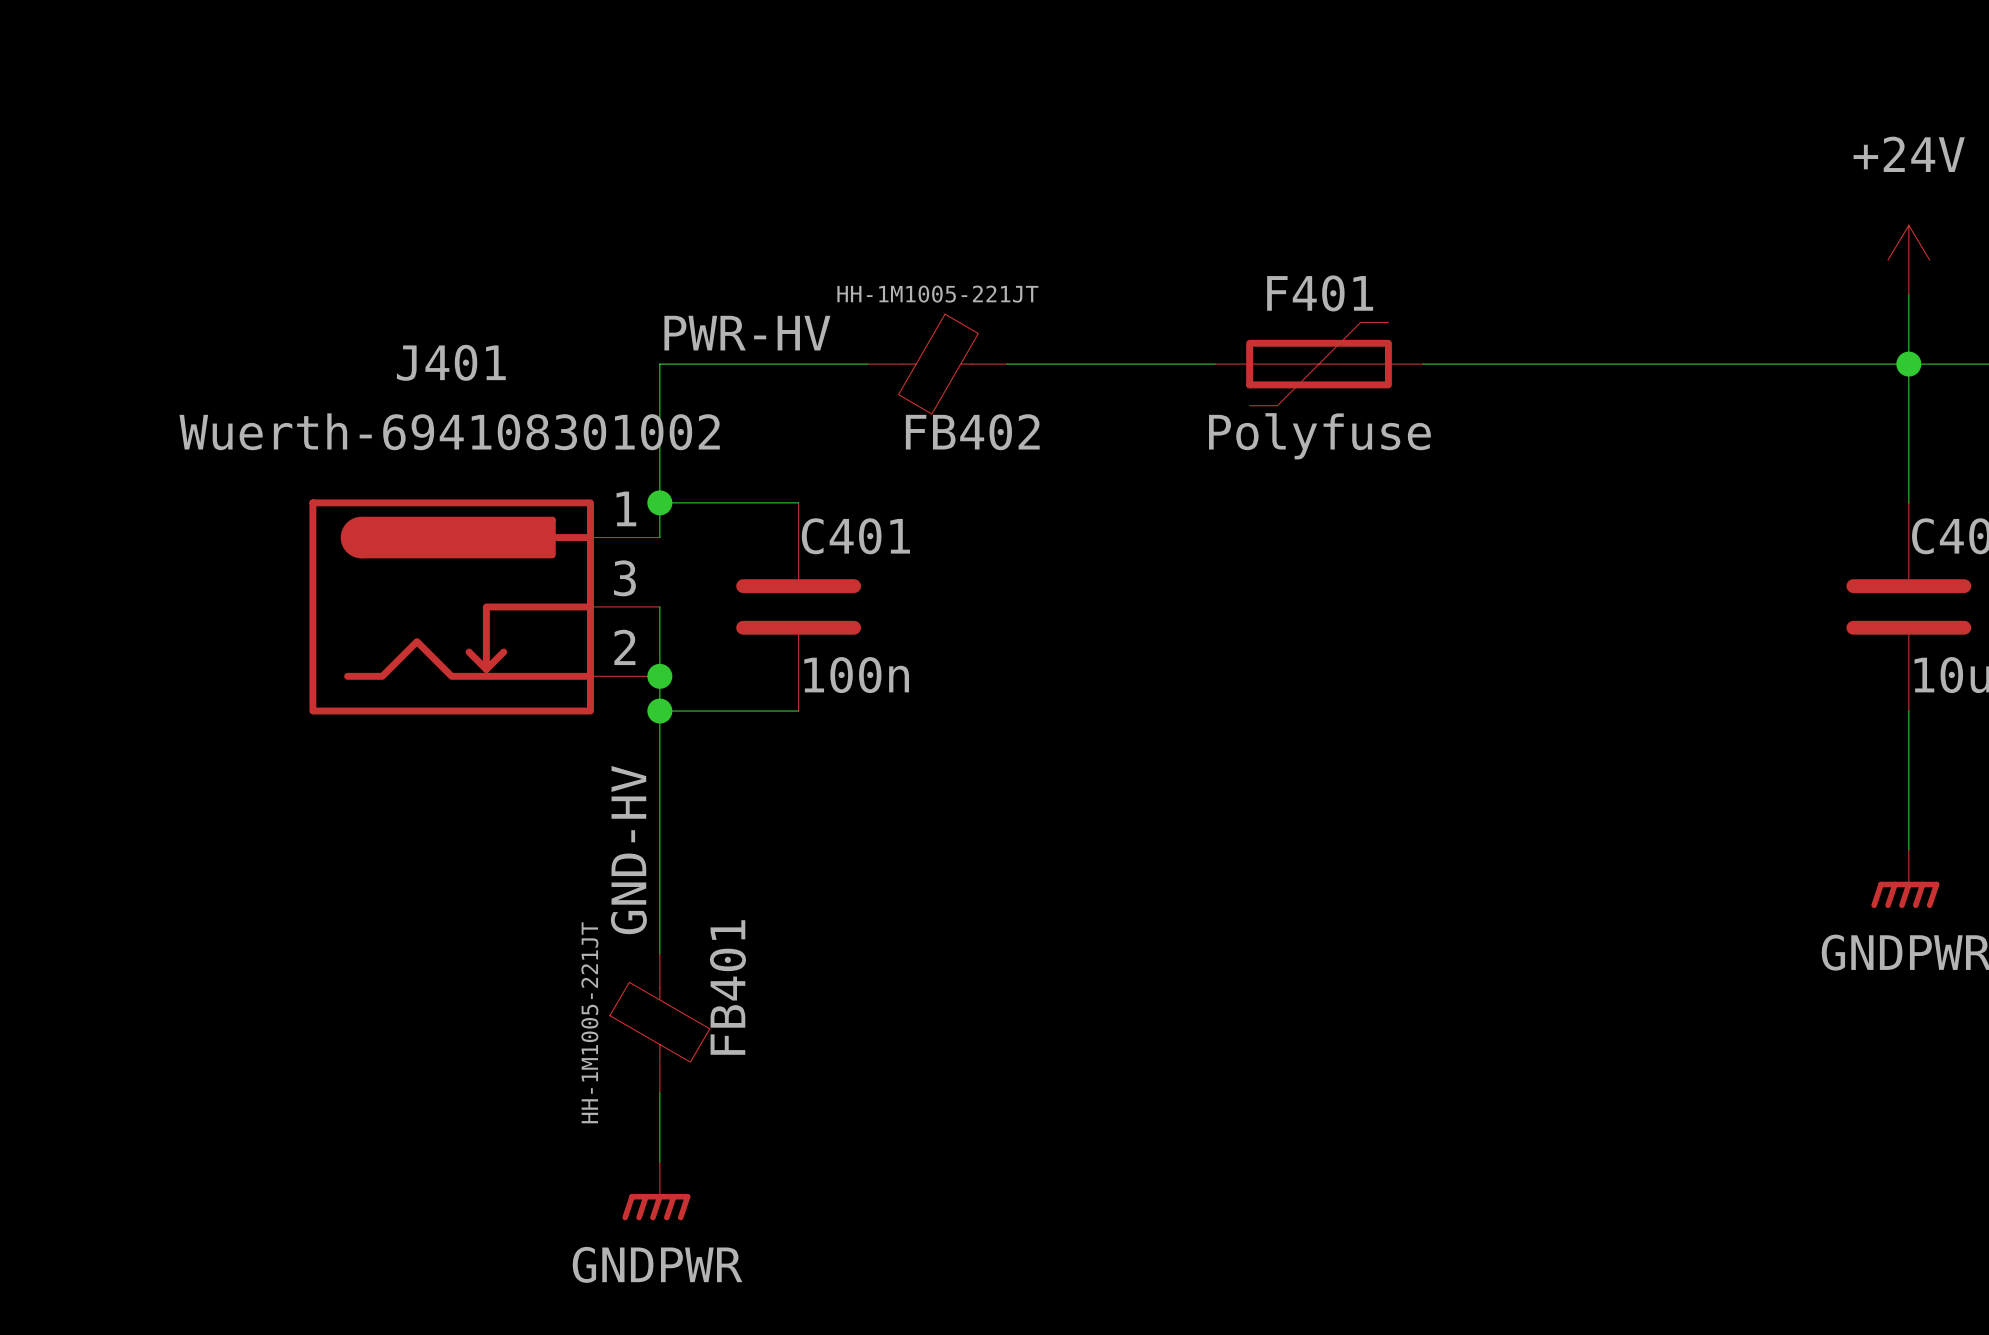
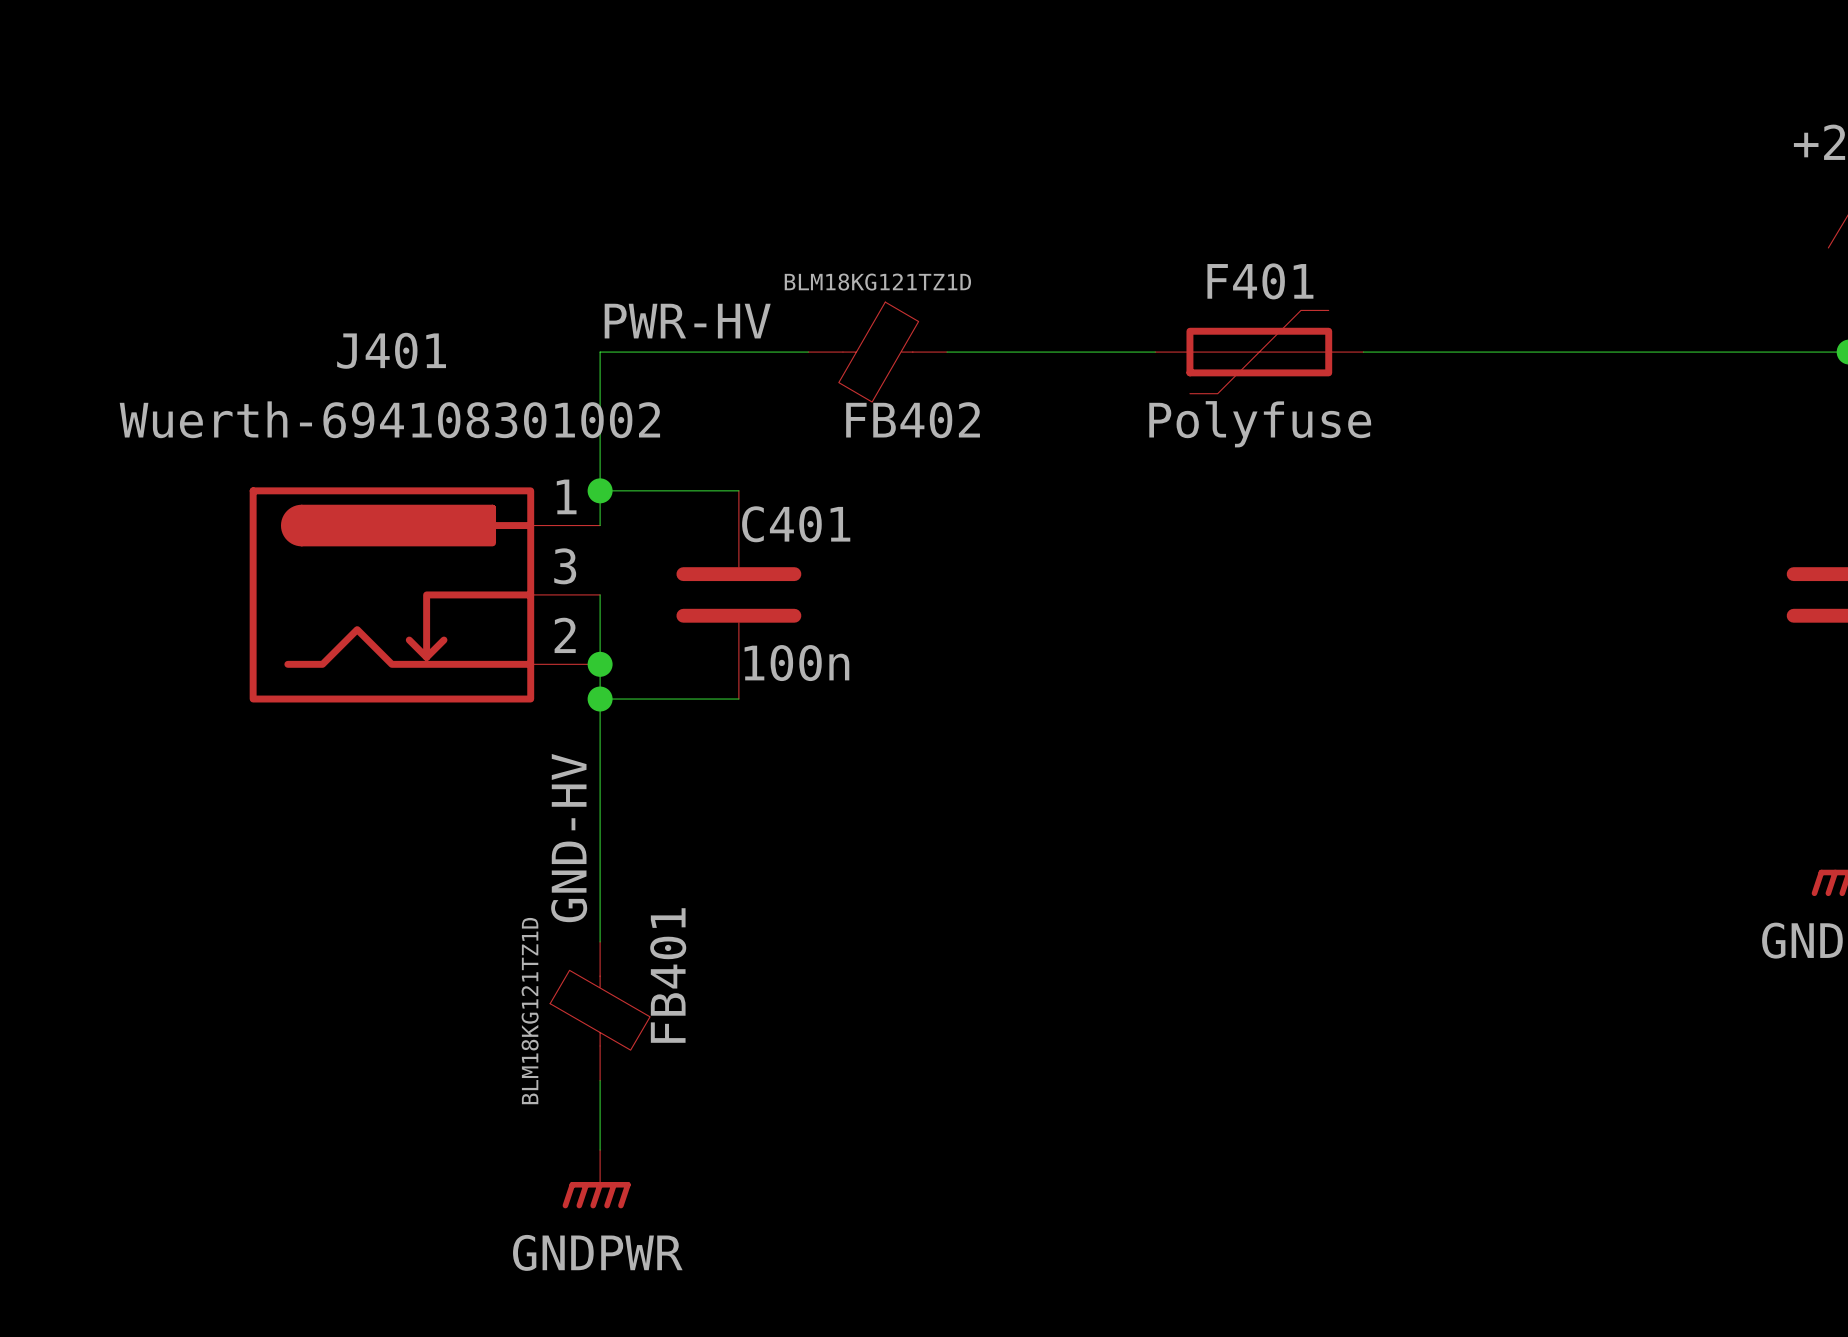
FB402 value: HH-1M1005-221JT (937, 294) -> BLM18KG121TZ1D (877, 282)
FB401 value: HH-1M1005-221JT (589, 1022) -> BLM18KG121TZ1D (530, 1011)

